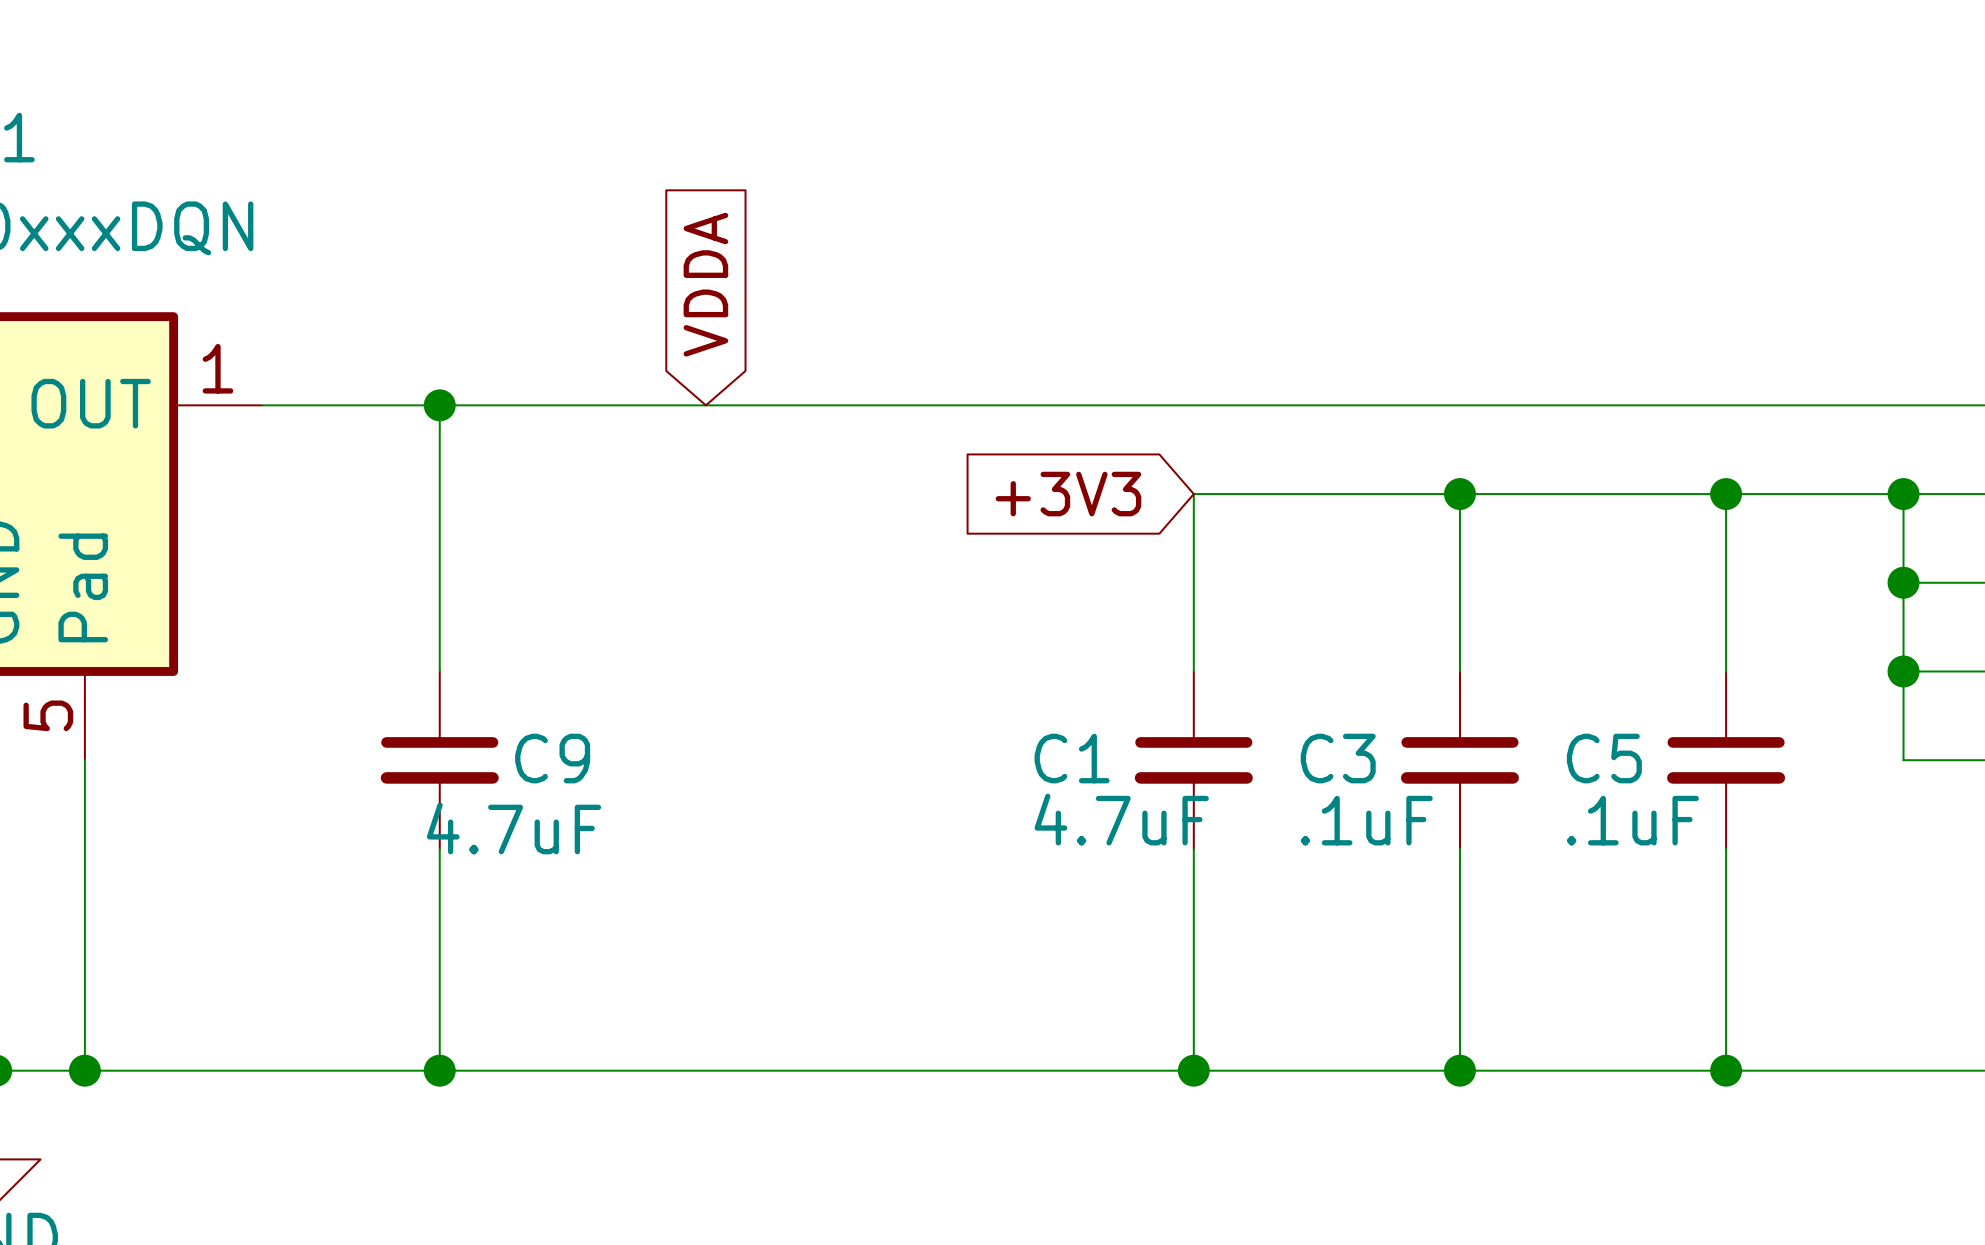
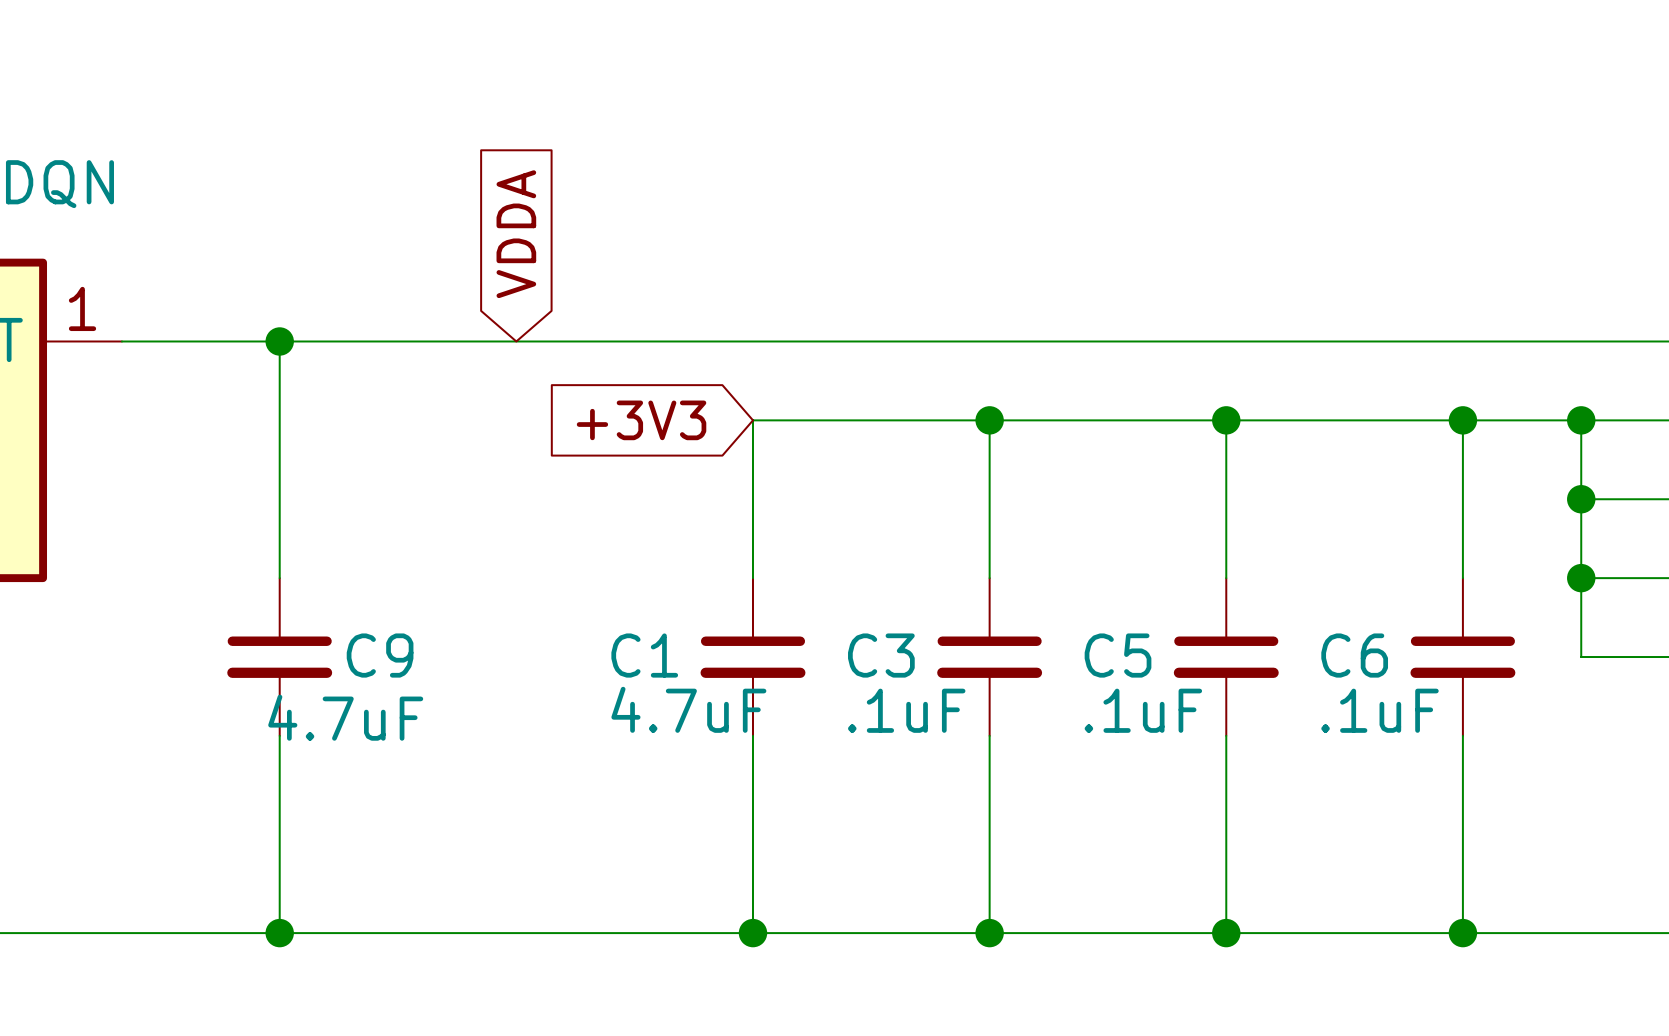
global label position: +3V3 (1068, 494) -> +3V3 (641, 420)
wire: (1193, 494) (1193, 671) -> (950, 420) (752, 420) (752, 578)
wire: none -> (989, 420) (989, 578)
junction: none -> (989, 420)
wire: (1459, 494) (1459, 671) -> (1226, 420) (1226, 578)
junction position: (1459, 494) -> (1226, 420)
wire: (1726, 494) (1726, 671) -> (1462, 420) (1462, 578)
junction position: (1726, 494) -> (1462, 420)
C1 position: (1193, 760) -> (752, 657)
C3 position: (1459, 760) -> (989, 657)
C5 position: (1726, 760) -> (1226, 657)
C6: none -> .1uF (1462, 657)
wire: none -> (752, 735) (752, 933)
wire: (1193, 848) (1193, 1070) -> (989, 735) (989, 933)
wire: (1459, 848) (1459, 1070) -> (1226, 735) (1226, 933)
wire: (1726, 848) (1726, 1070) -> (1462, 735) (1462, 933)
junction: none -> (752, 933)
junction position: (1193, 1070) -> (989, 933)
junction position: (1459, 1070) -> (1226, 933)
junction position: (1726, 1070) -> (1462, 933)

